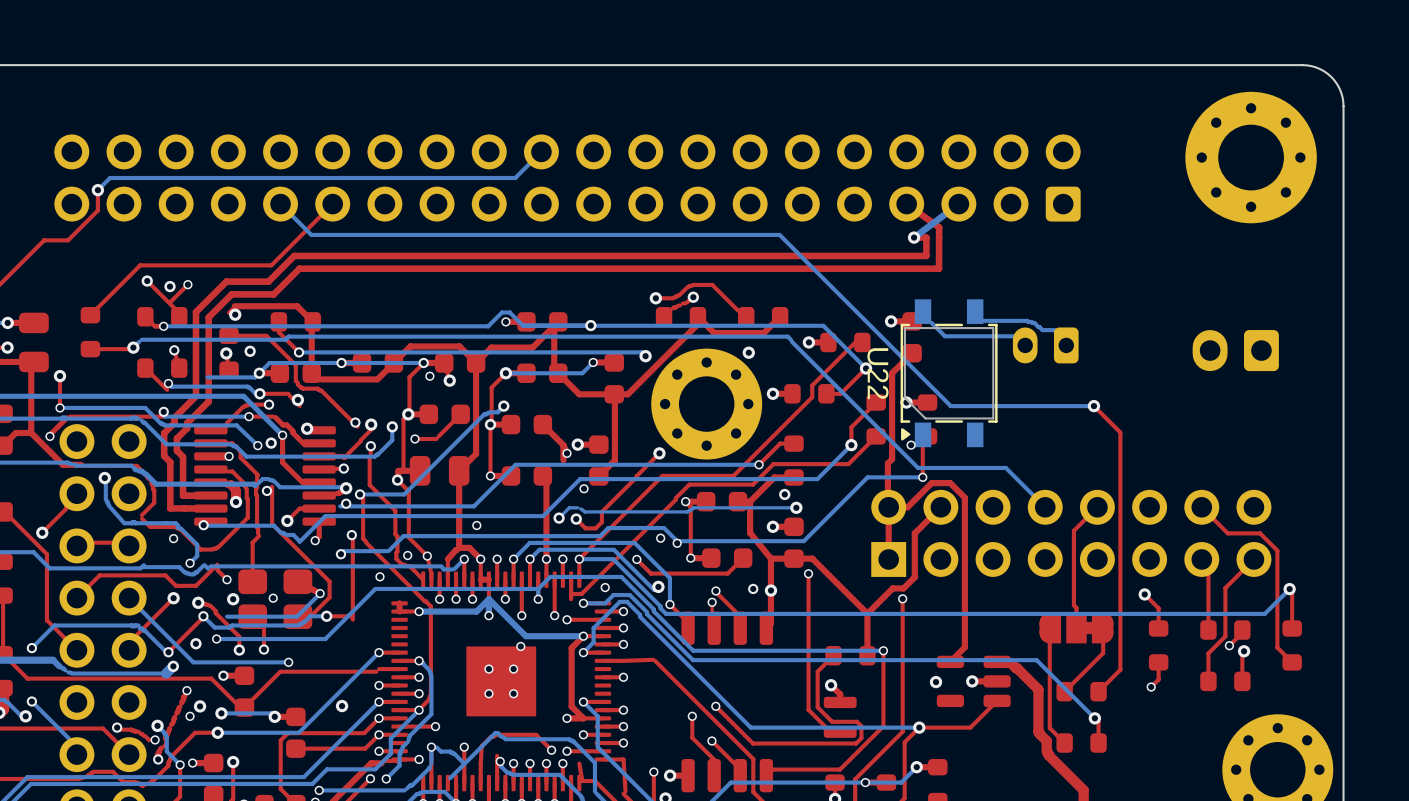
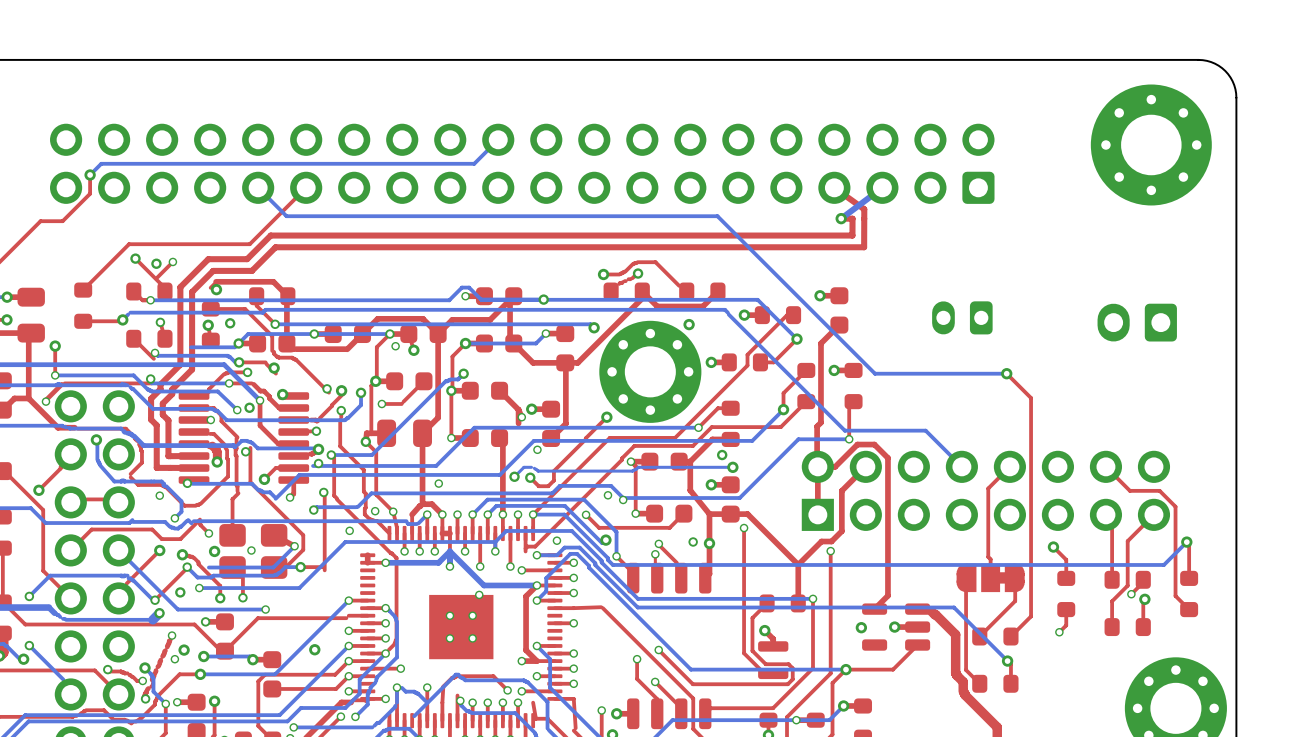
bottom track: (984, 320) (1027, 320) (1034, 322) (1042, 330) (1054, 330) -> none
bottom track: (931, 322) (944, 336) (1013, 336) -> none
U22: (949, 373) -> none
via: (911, 445) -> none

